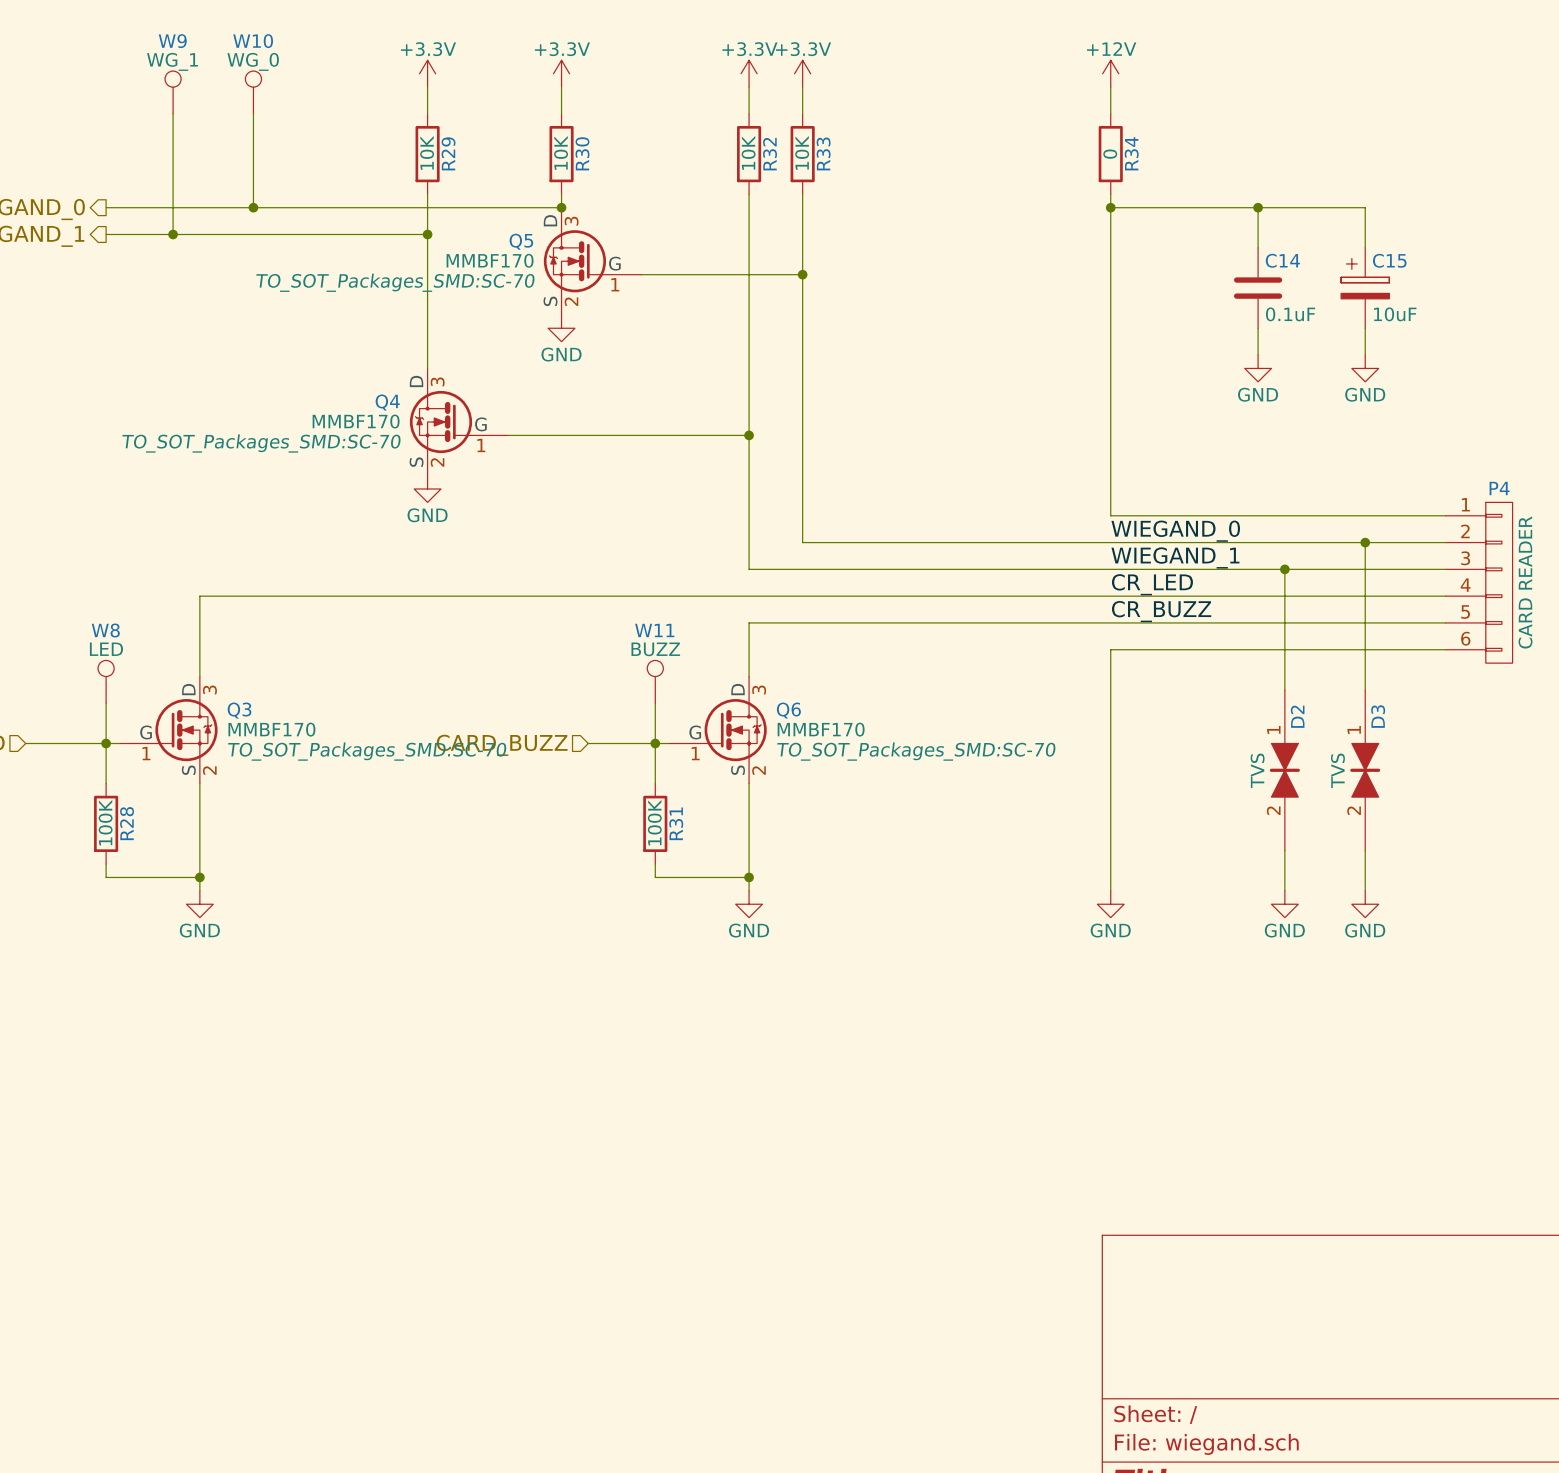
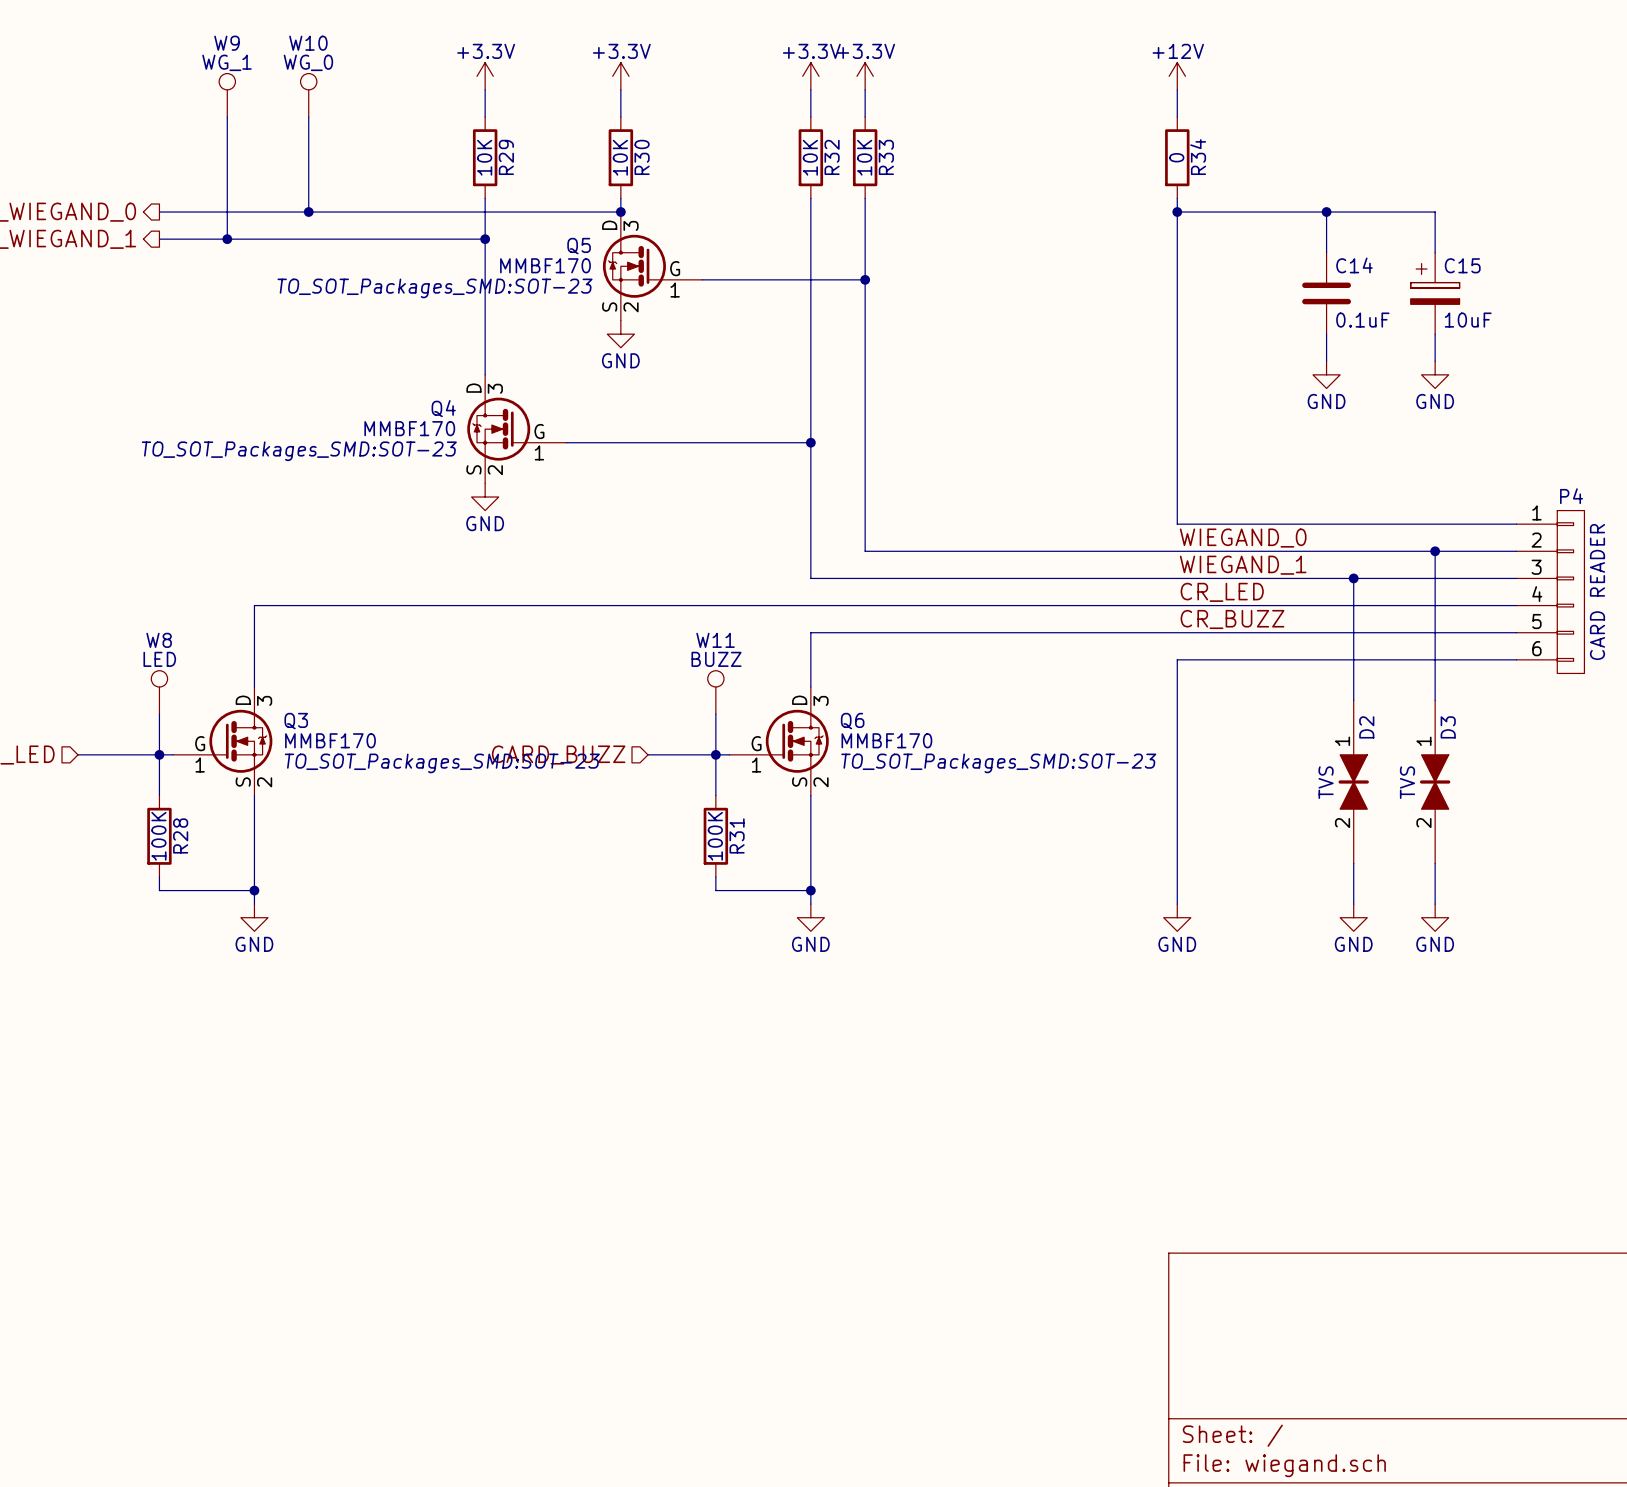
Q5 text: TO_SOT_Packages_SMD:SC-70 (395, 282) -> TO_SOT_Packages_SMD:SOT-23 (435, 288)
Q4 text: TO_SOT_Packages_SMD:SC-70 (261, 443) -> TO_SOT_Packages_SMD:SOT-23 (299, 451)
Q3 text: TO_SOT_Packages_SMD:SC-70 (367, 751) -> TO_SOT_Packages_SMD:SOT-23 (442, 763)
Q6 text: TO_SOT_Packages_SMD:SC-70 (916, 751) -> TO_SOT_Packages_SMD:SOT-23 (998, 763)

